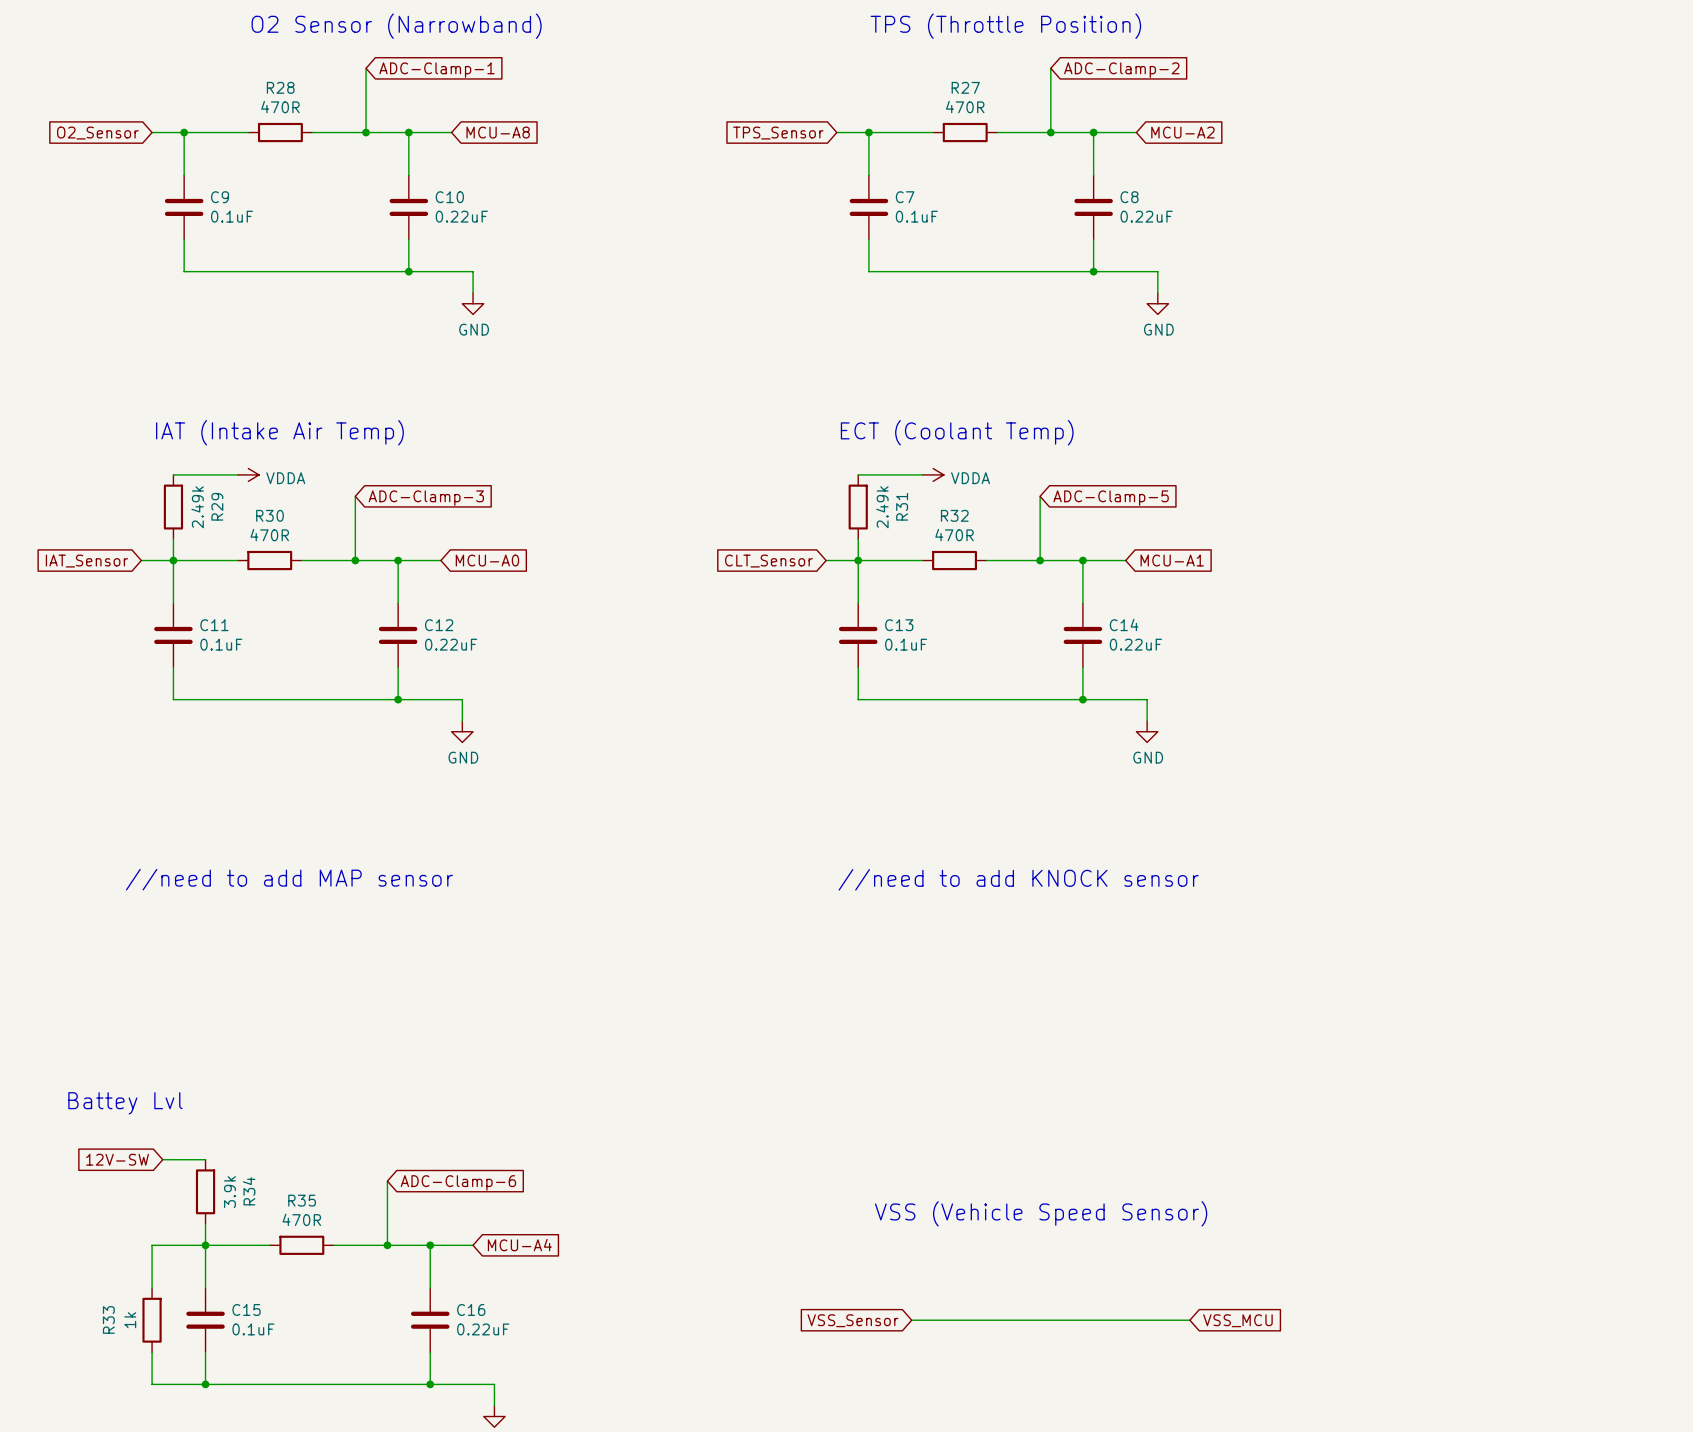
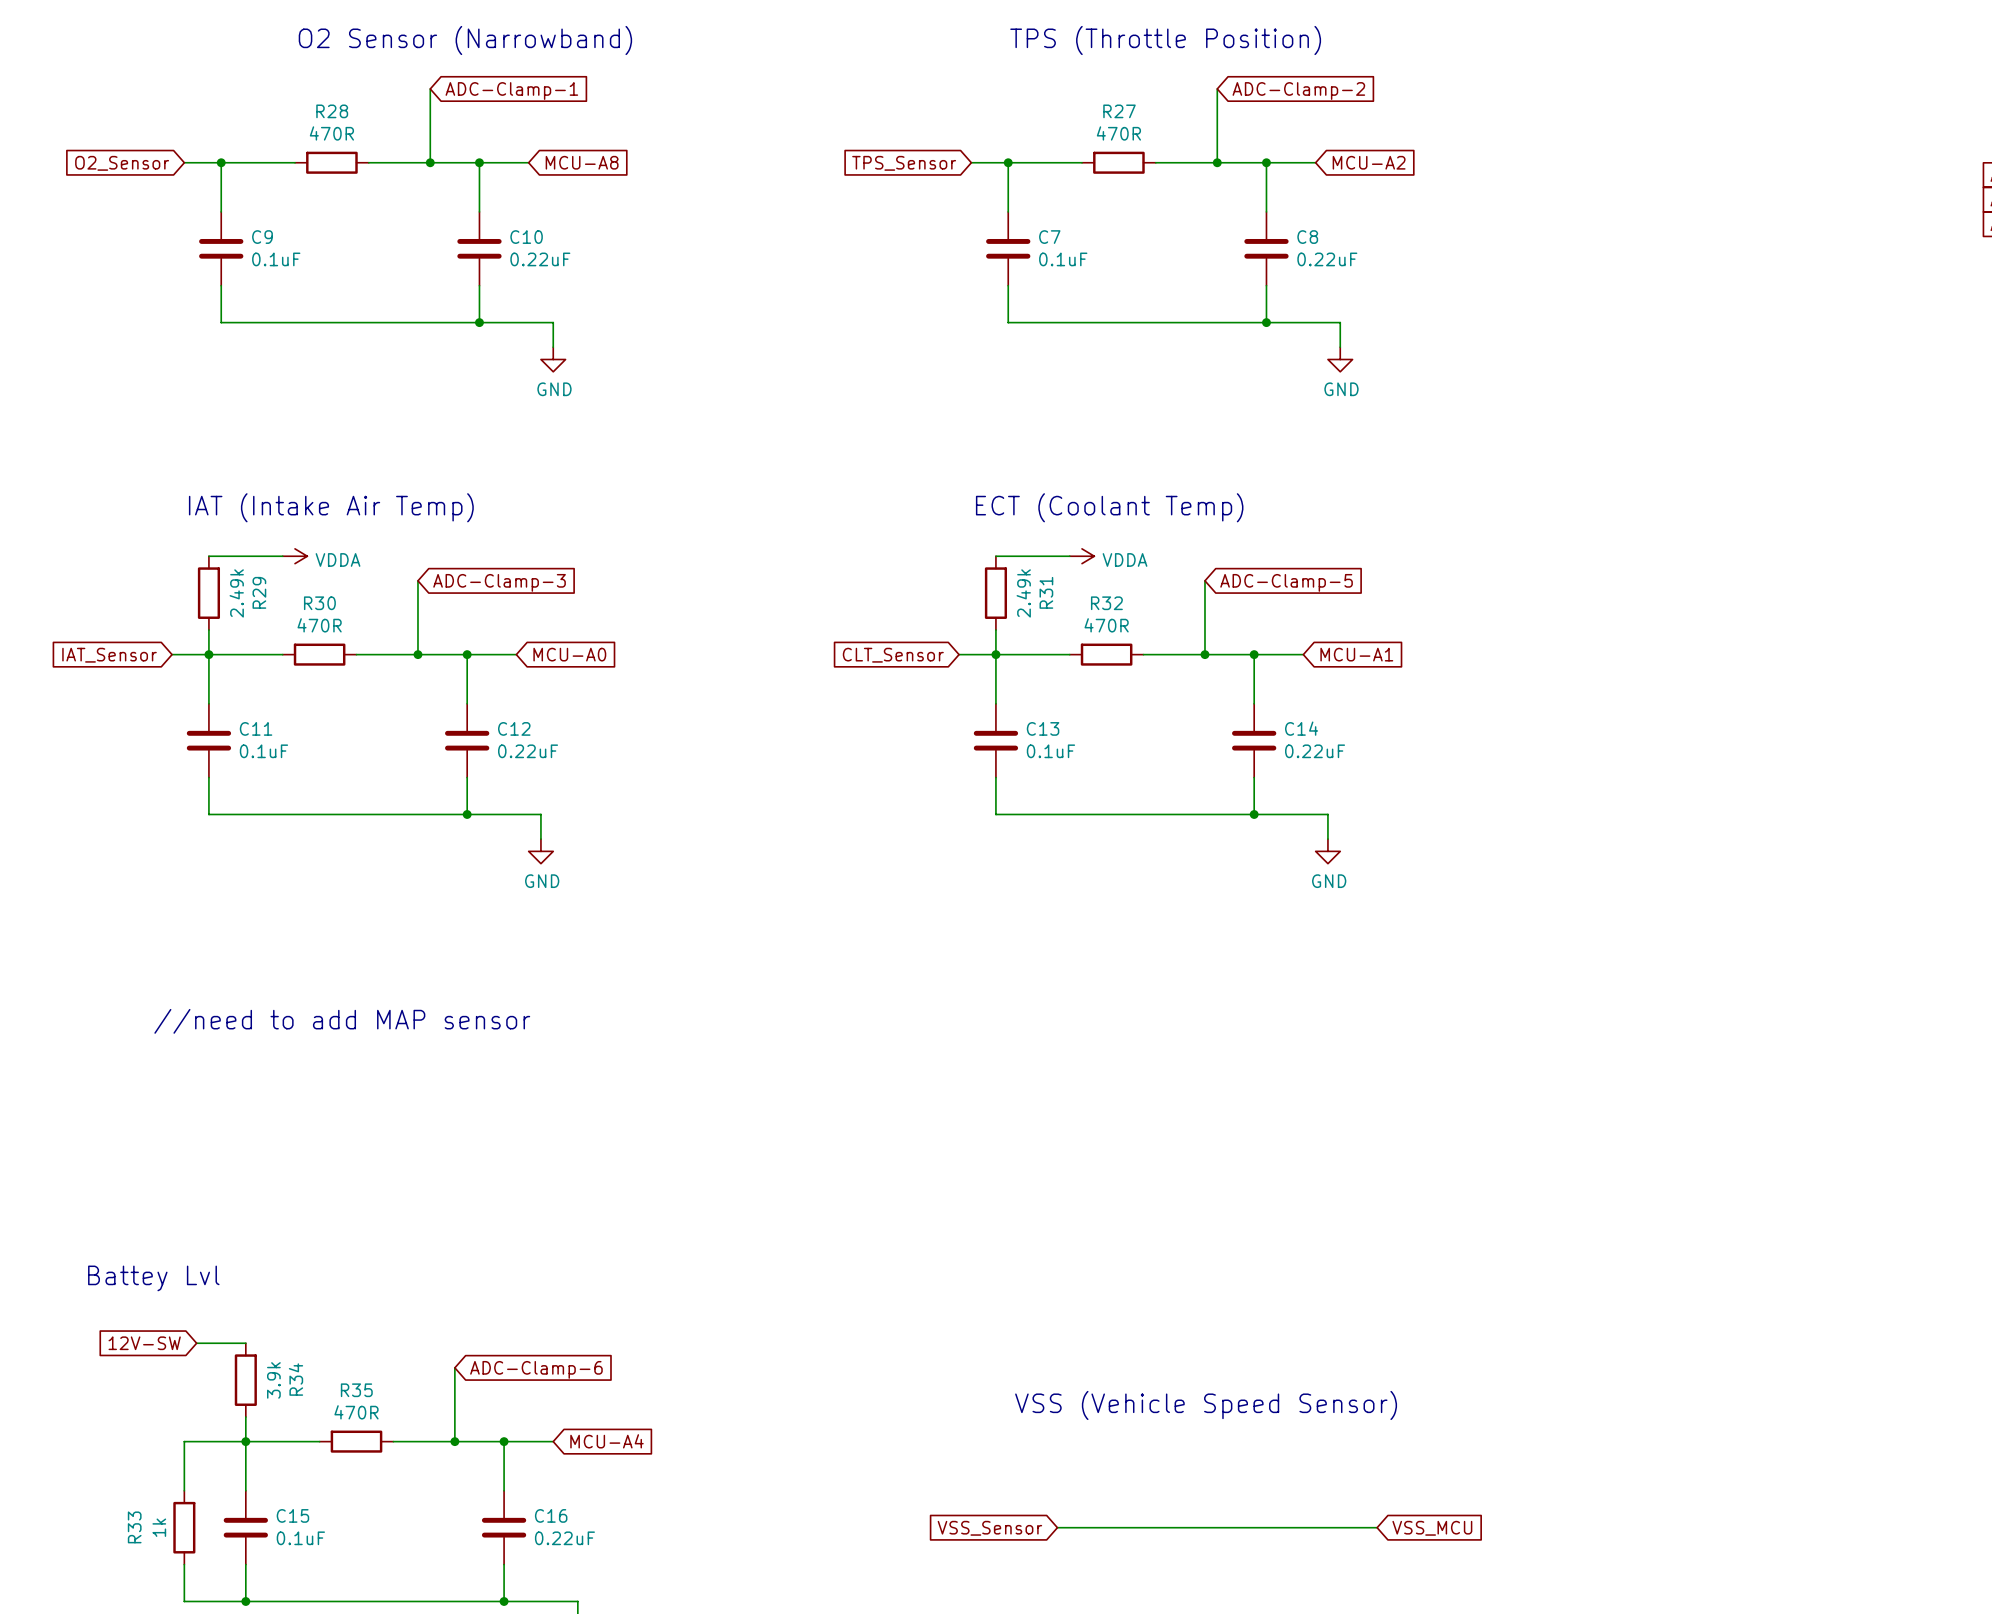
text: //need to add KNOCK sensor (1018, 879) -> none

